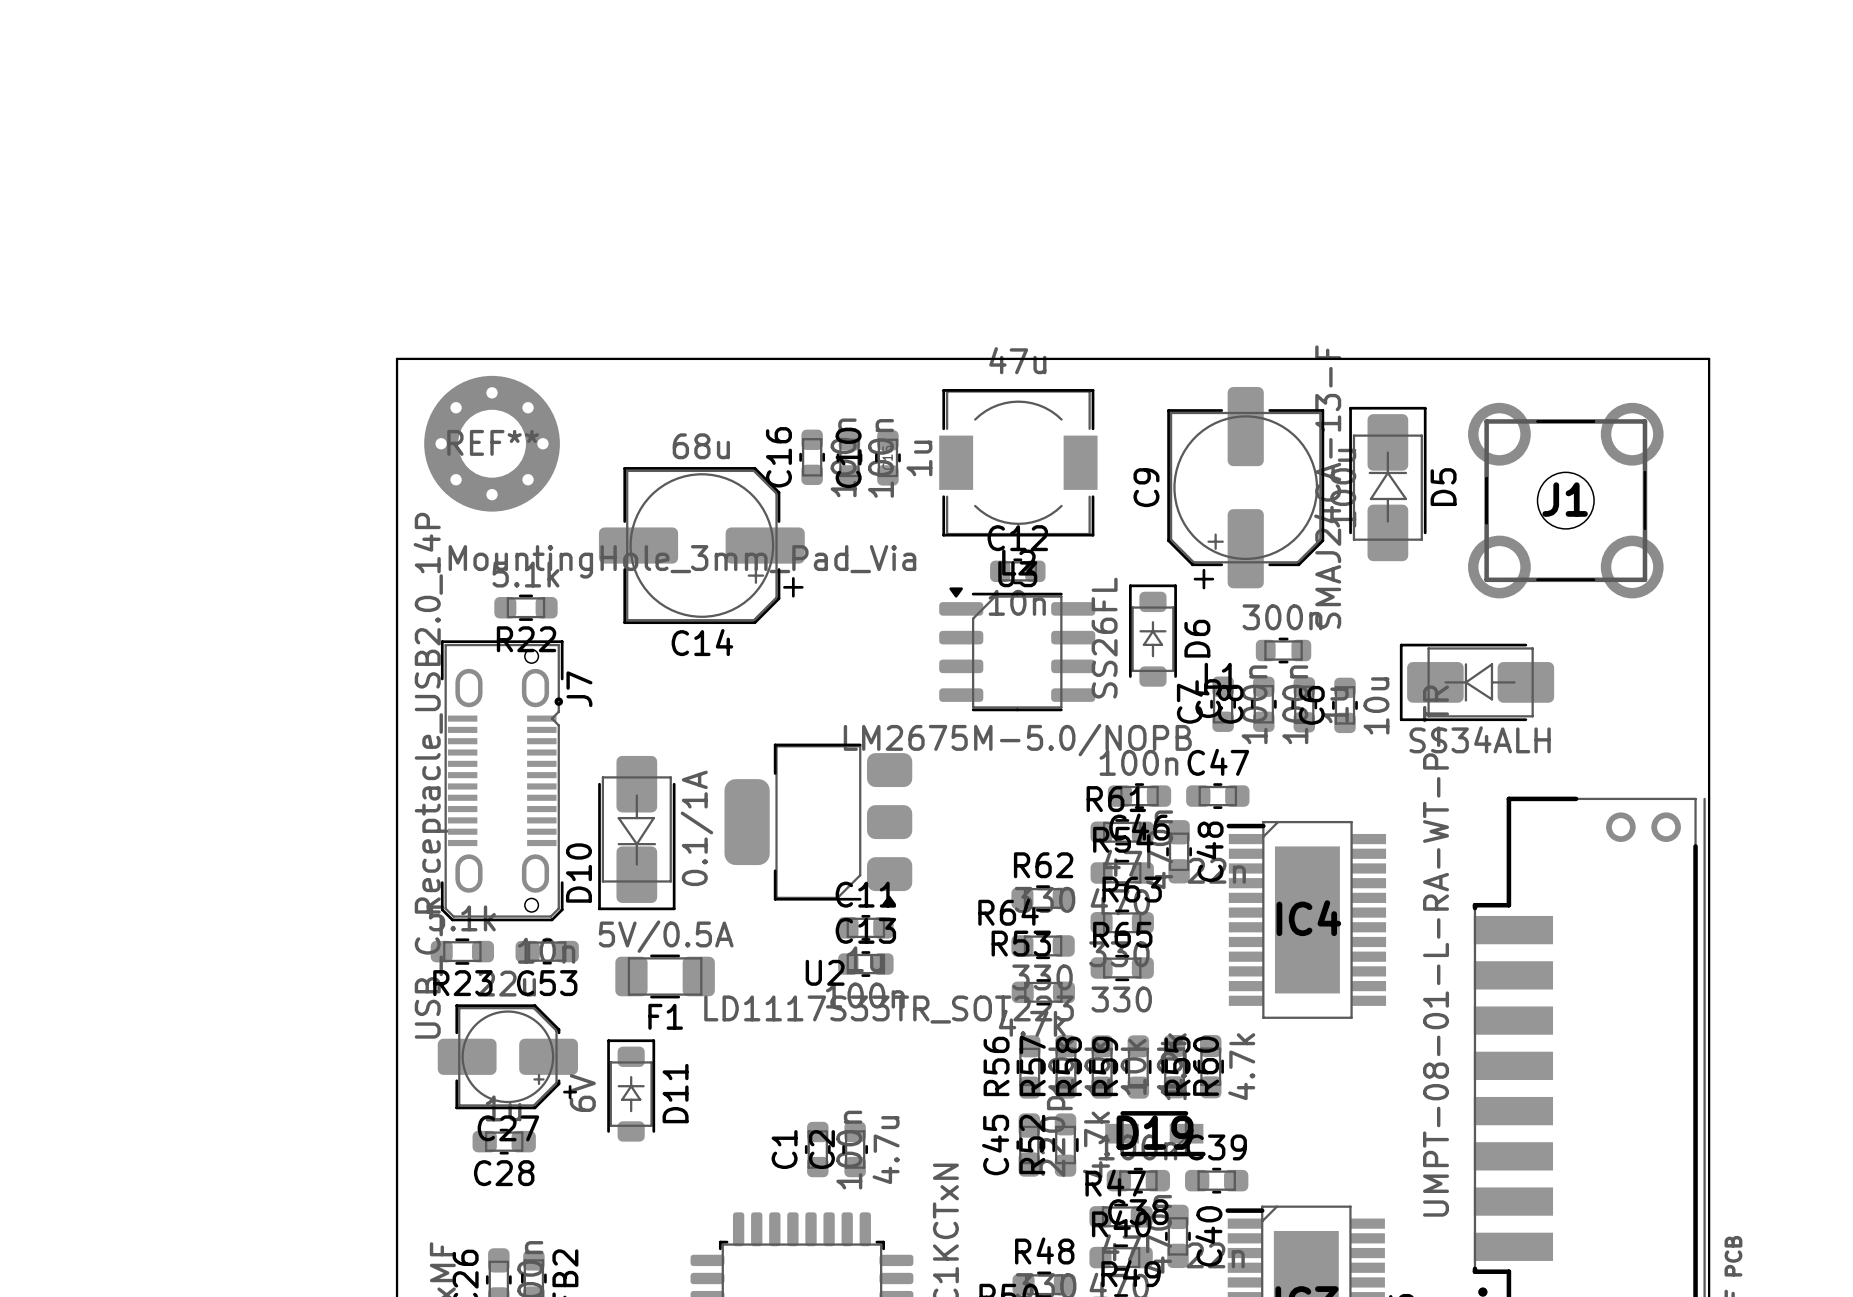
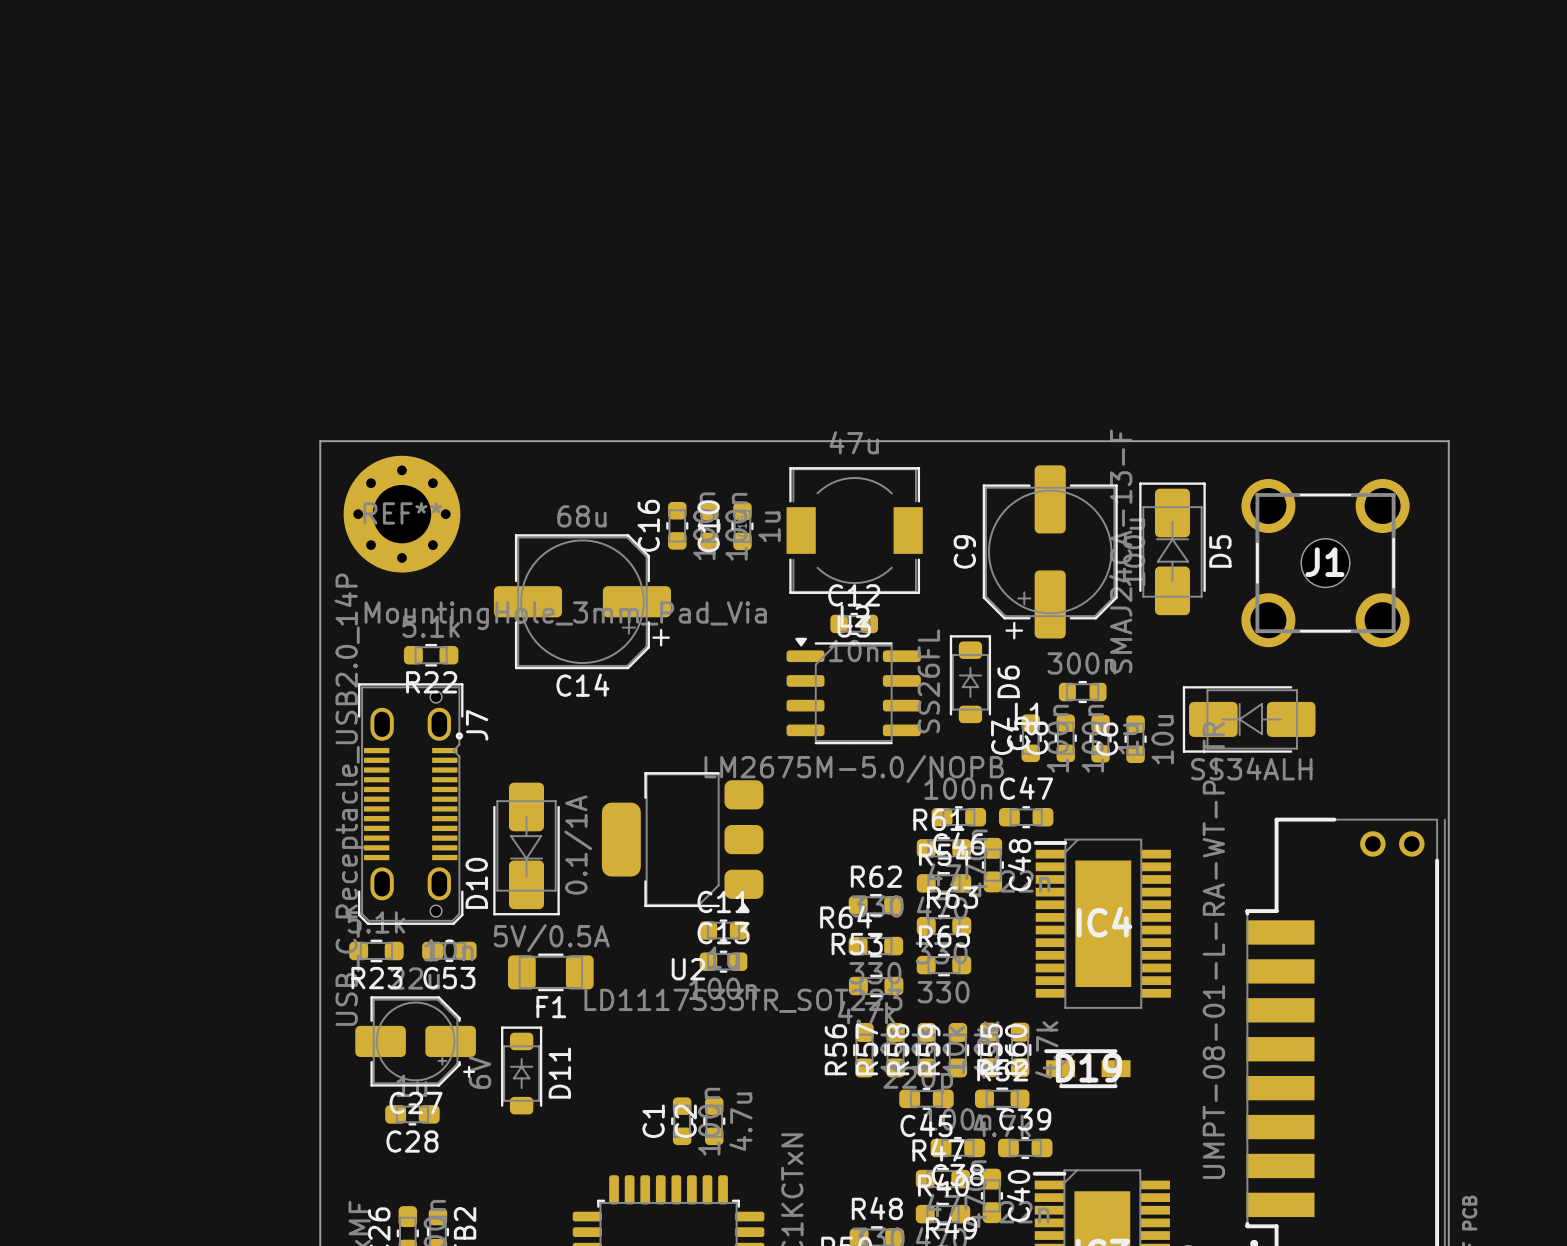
D19 rotation: 0° (1155, 1133) -> 180° (1087, 1068)
D19 position: (1155, 1133) -> (1087, 1068)
C45 name position: C45 (995, 1145) -> C45 (926, 1125)
C45 rotation: 0° (1029, 1145) -> 90° clockwise (926, 1098)
C45 position: (1029, 1145) -> (926, 1098)
R52 rotation: 0° (1065, 1145) -> 90° clockwise (1002, 1098)
R52 position: (1065, 1145) -> (1002, 1098)

